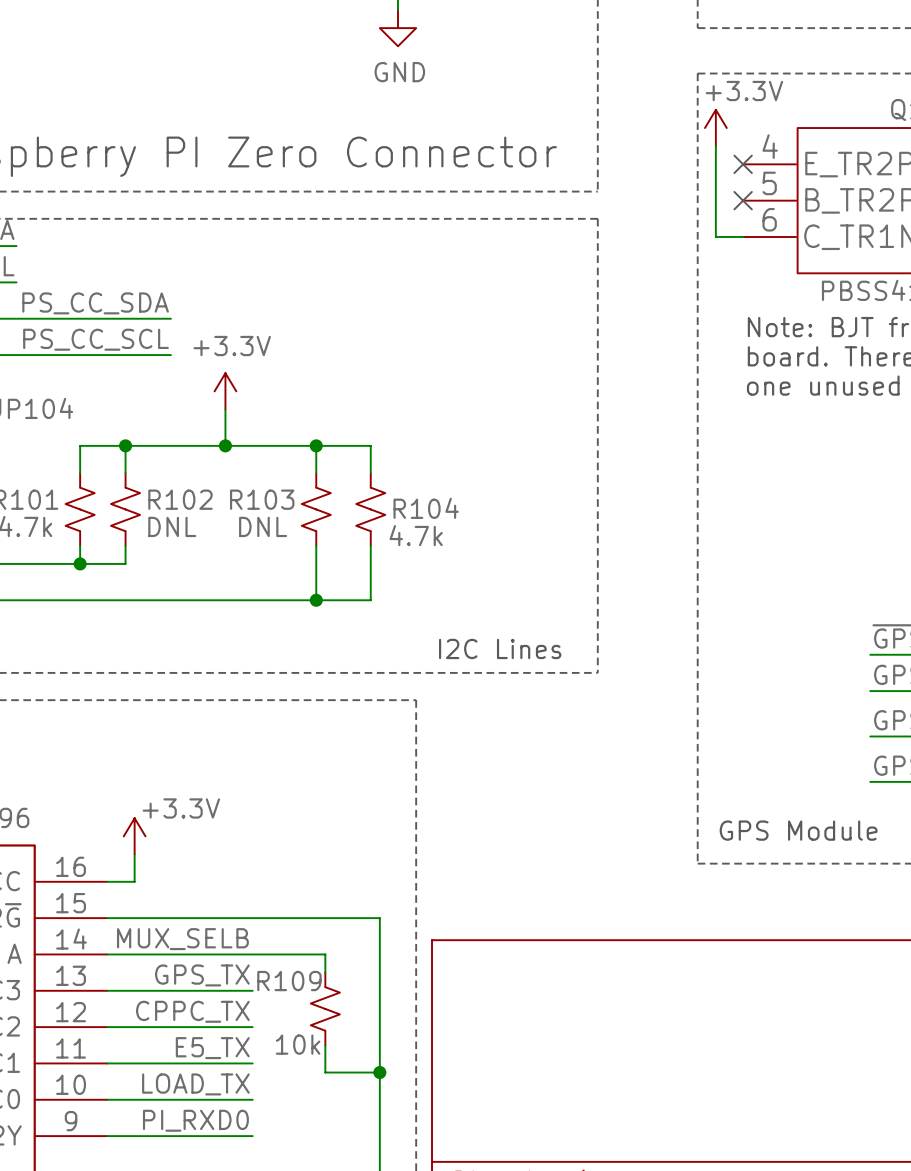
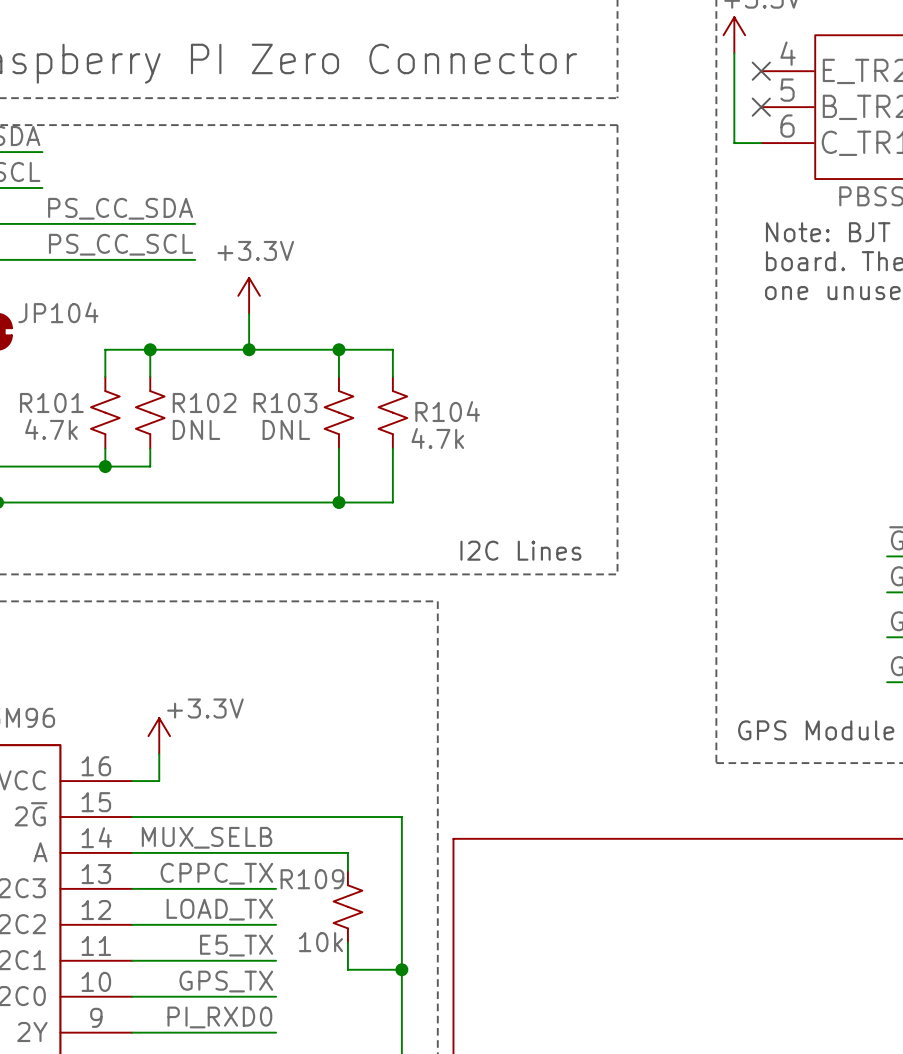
label: GPS_TX (202, 975) -> CPPC_TX (216, 873)
label: CPPC_TX (192, 1011) -> LOAD_TX (219, 909)
label: LOAD_TX (195, 1084) -> GPS_TX (226, 981)

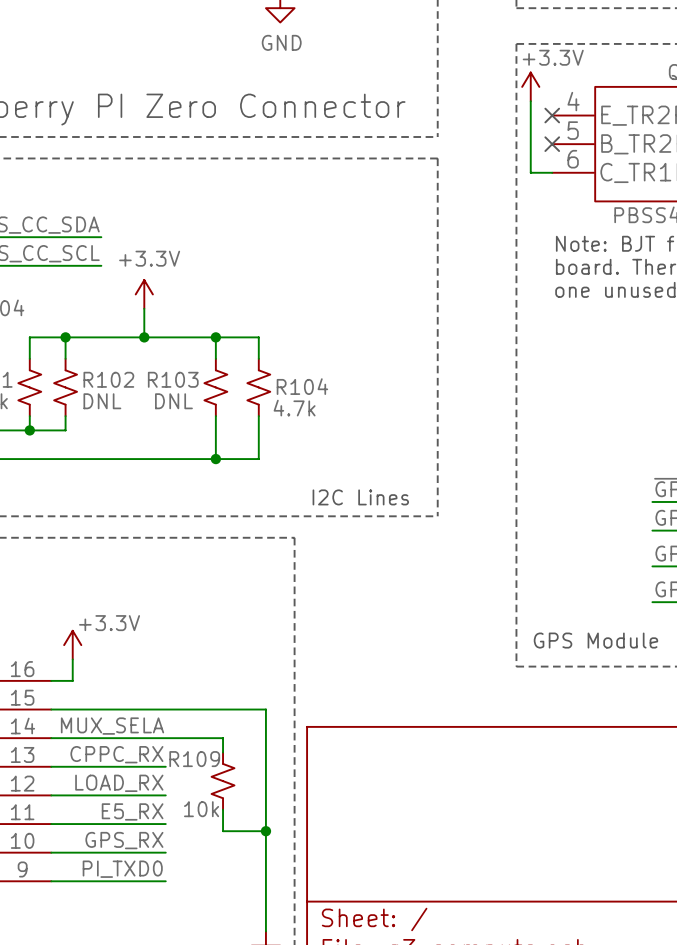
label: MUX_SELB (207, 837) -> MUX_SELA (112, 726)
label: CPPC_TX (216, 873) -> CPPC_RX (116, 754)
label: LOAD_TX (219, 909) -> LOAD_RX (119, 783)
label: E5_TX (236, 945) -> E5_RX (132, 811)
label: GPS_TX (226, 981) -> GPS_RX (124, 840)
label: PI_RXD0 (219, 1017) -> PI_TXD0 (122, 869)

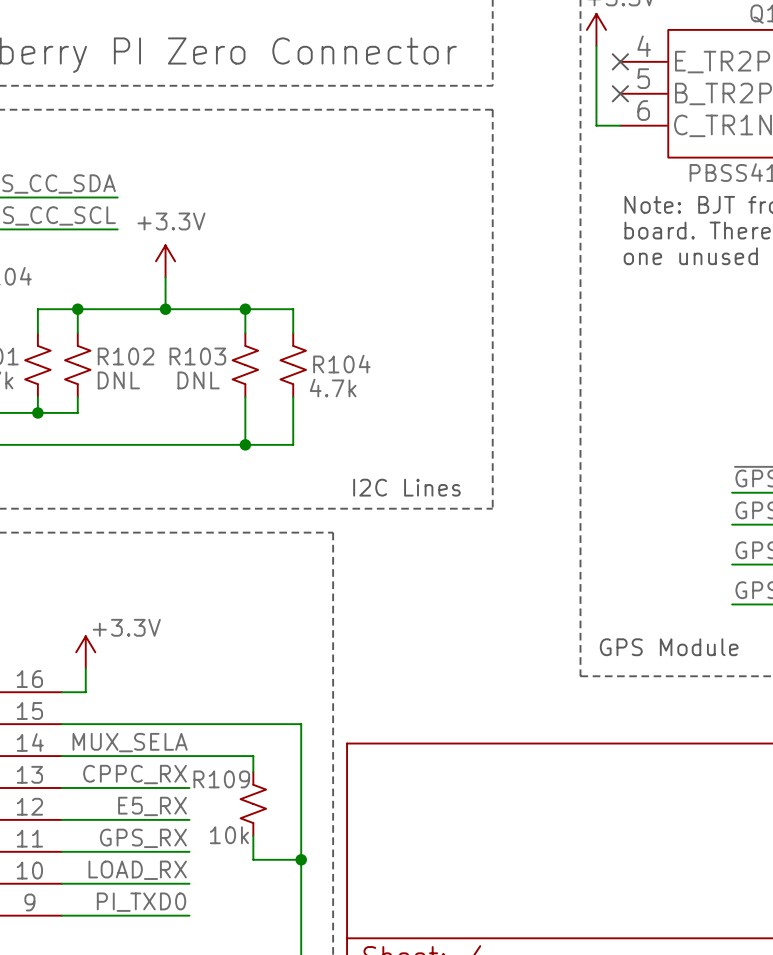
label: LOAD_RX (119, 783) -> E5_RX (152, 806)
label: E5_RX (132, 811) -> GPS_RX (143, 838)
label: GPS_RX (124, 840) -> LOAD_RX (137, 870)

